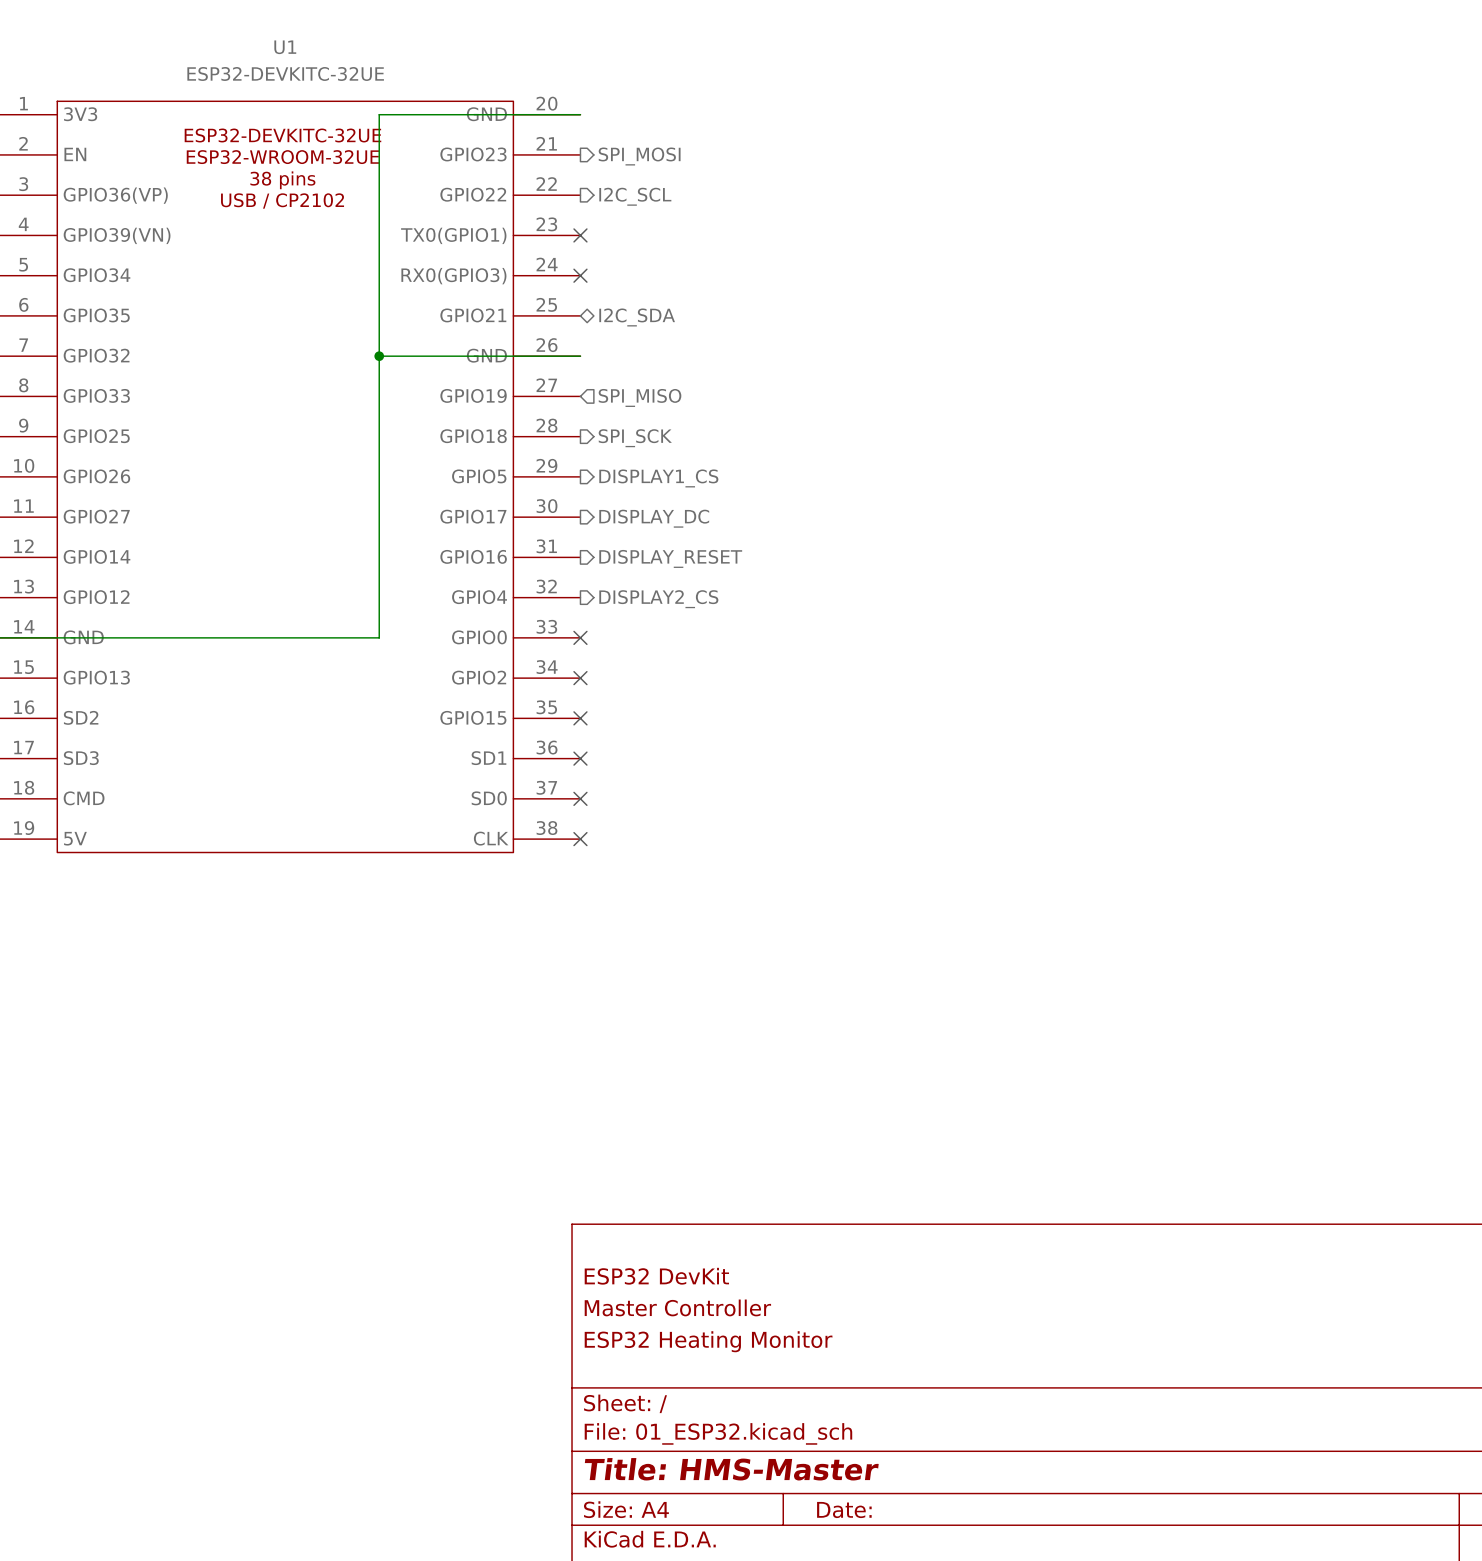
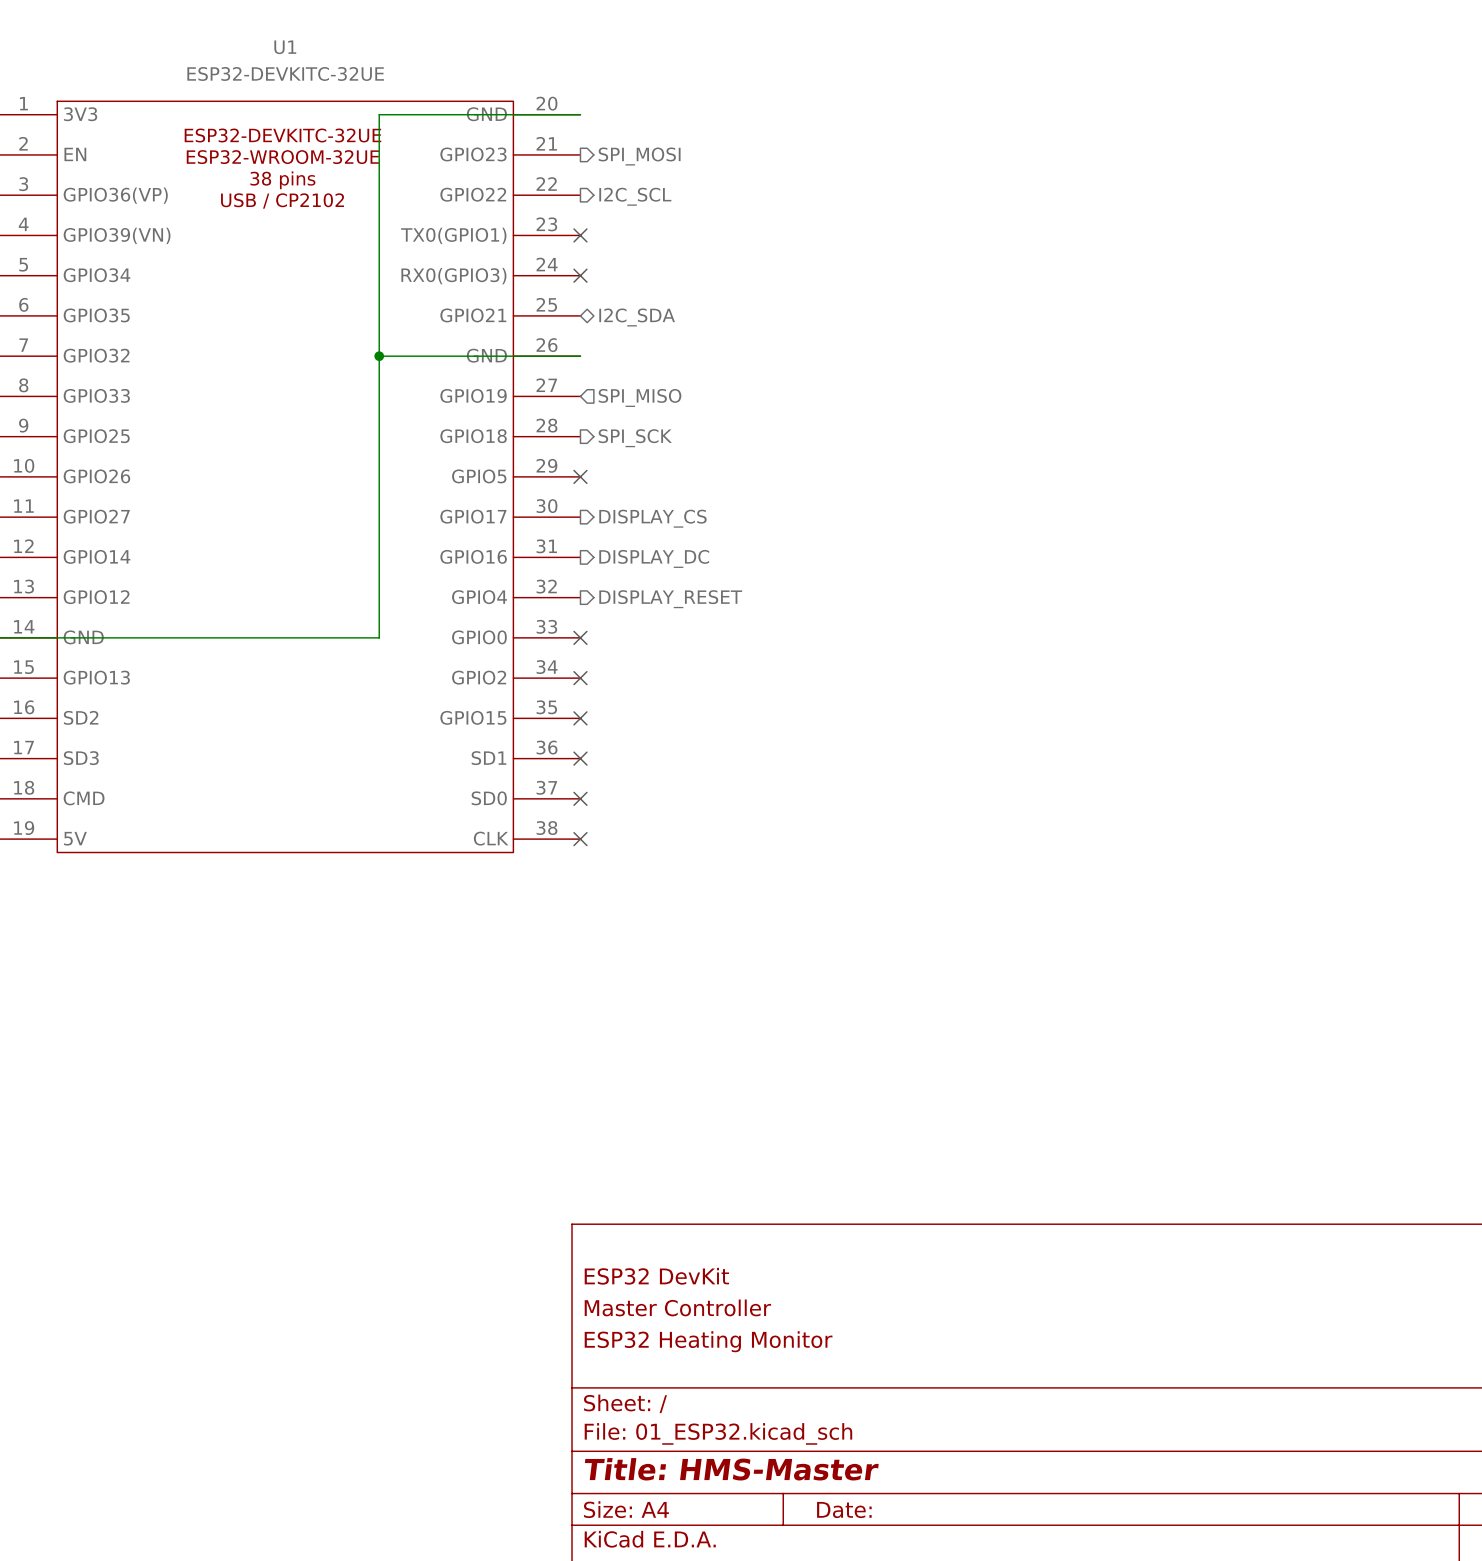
no-connect mark: none -> (580, 476)
hierarchical label: DISPLAY1_CS (658, 478) -> none
hierarchical label: DISPLAY_DC (654, 518) -> DISPLAY_CS (652, 518)
hierarchical label: DISPLAY_RESET (670, 558) -> DISPLAY_DC (654, 558)
hierarchical label: DISPLAY2_CS (658, 599) -> DISPLAY_RESET (670, 599)

